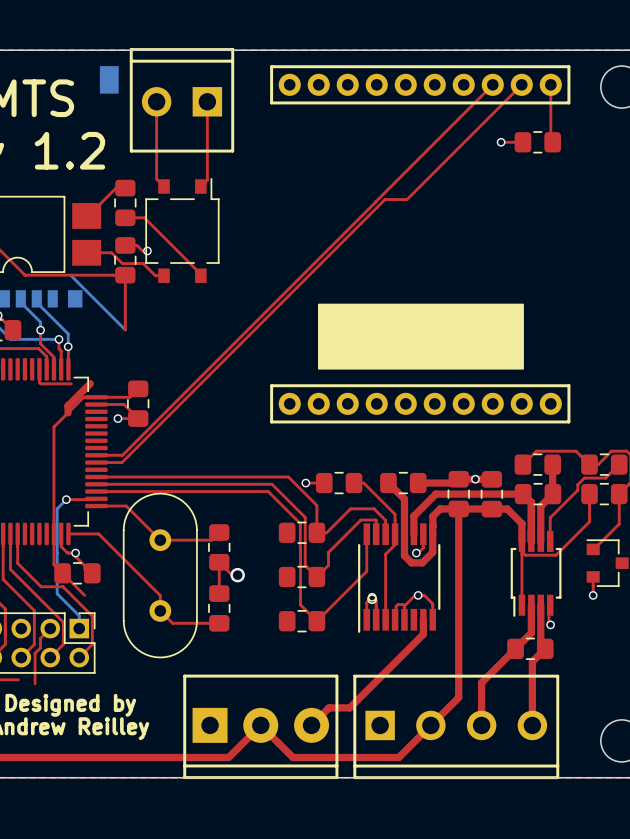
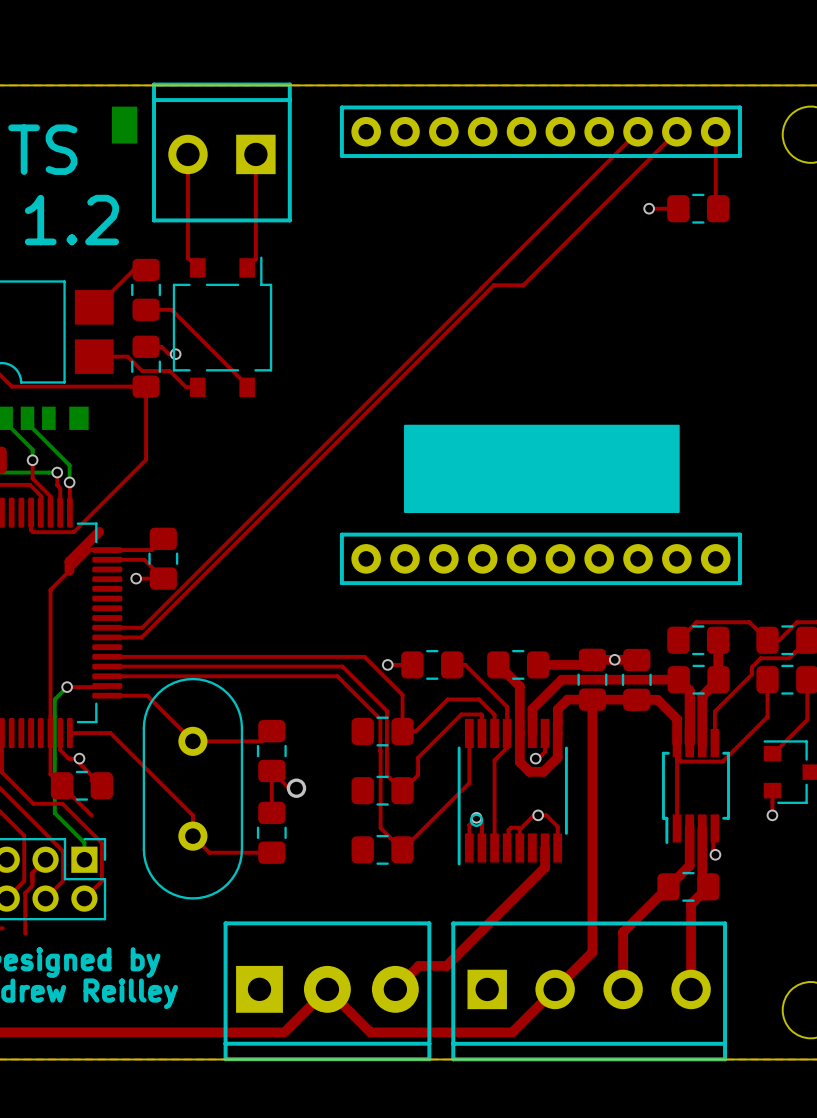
bottom track: (71, 275) (125, 329) -> none
top track: none -> (146, 459) (73, 532)

